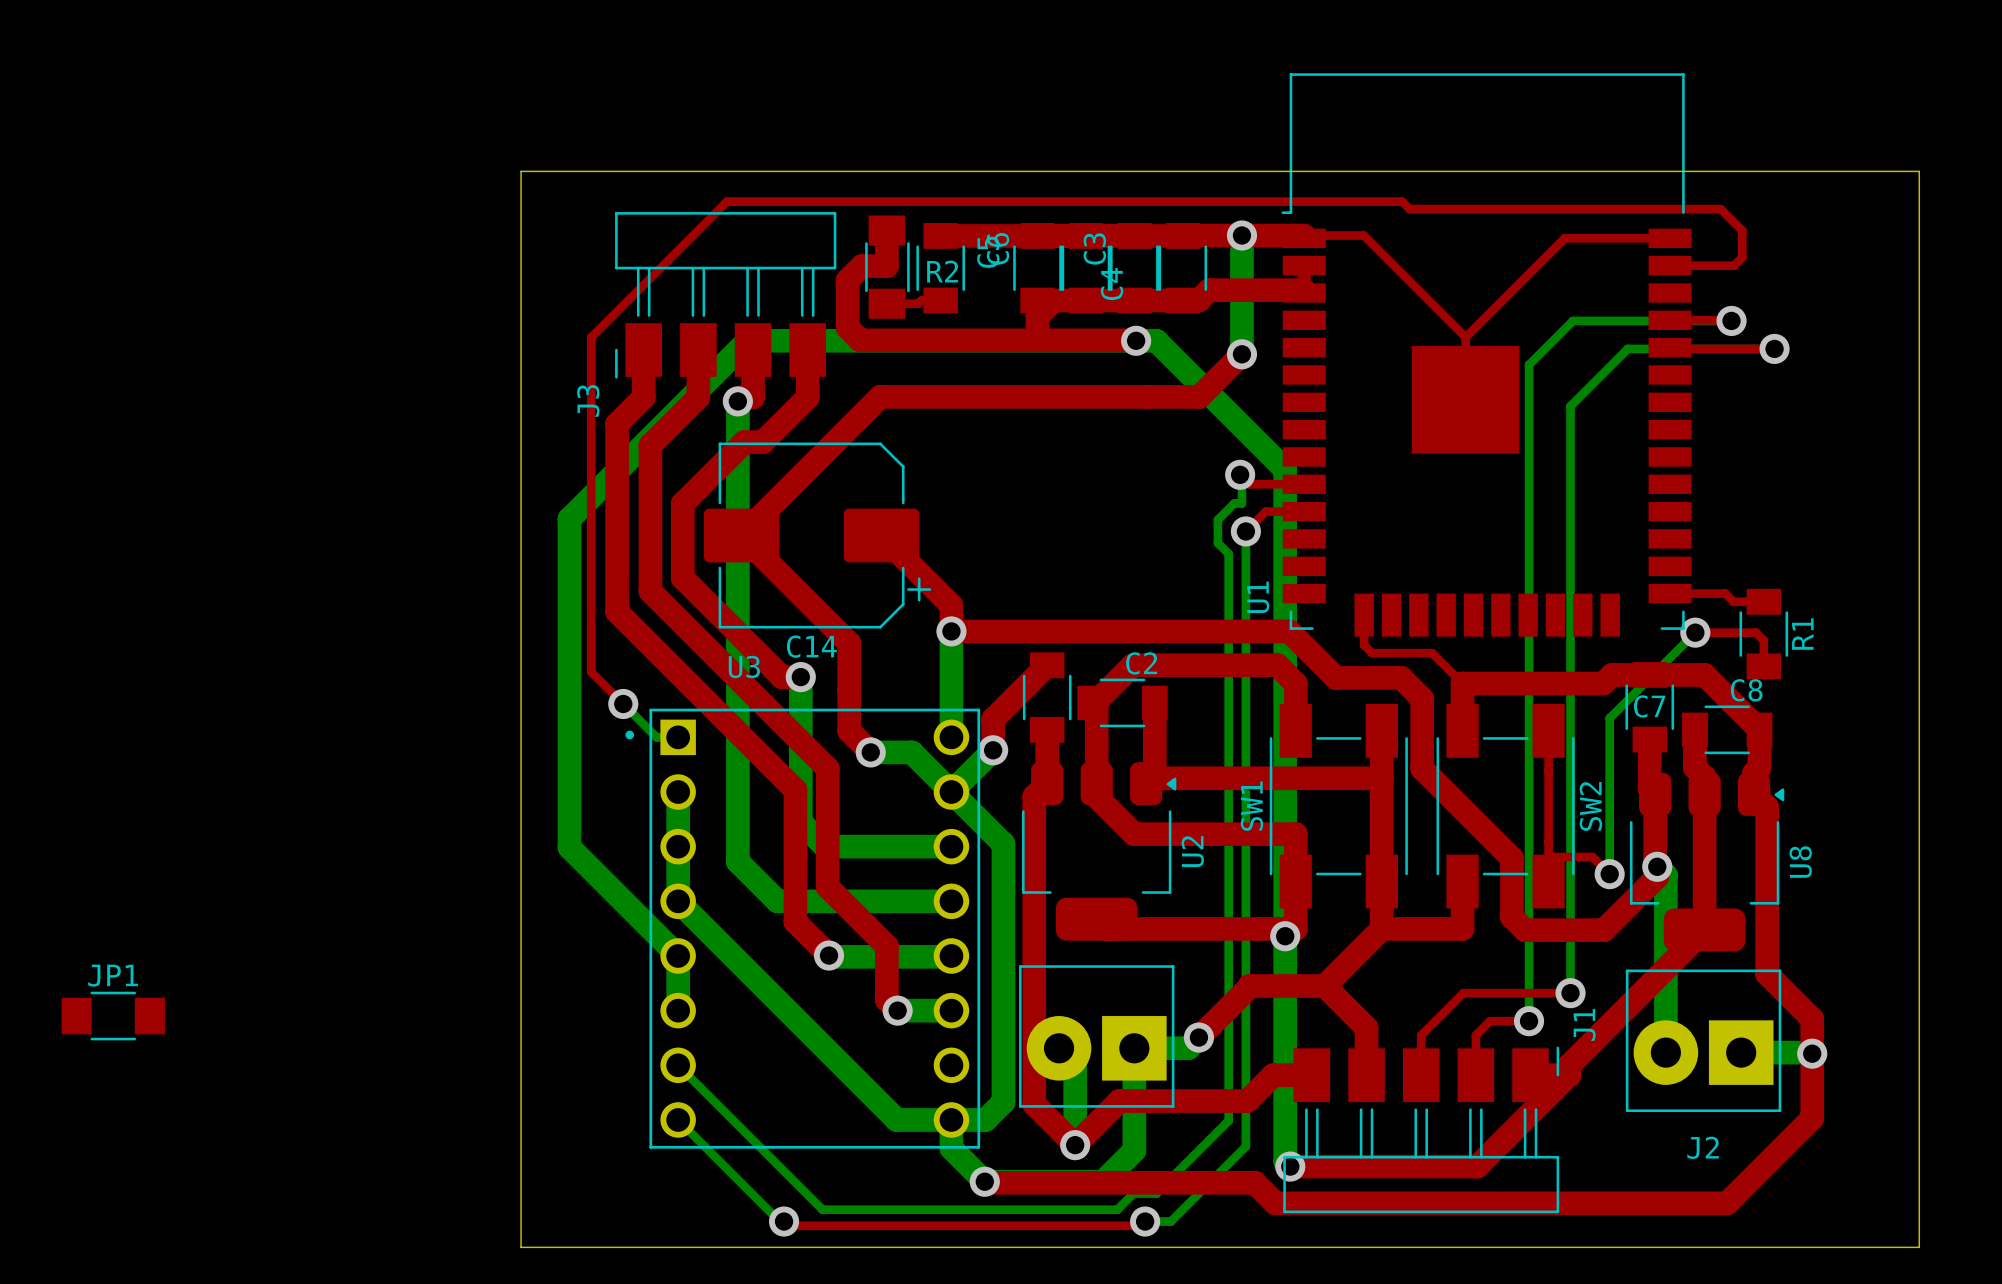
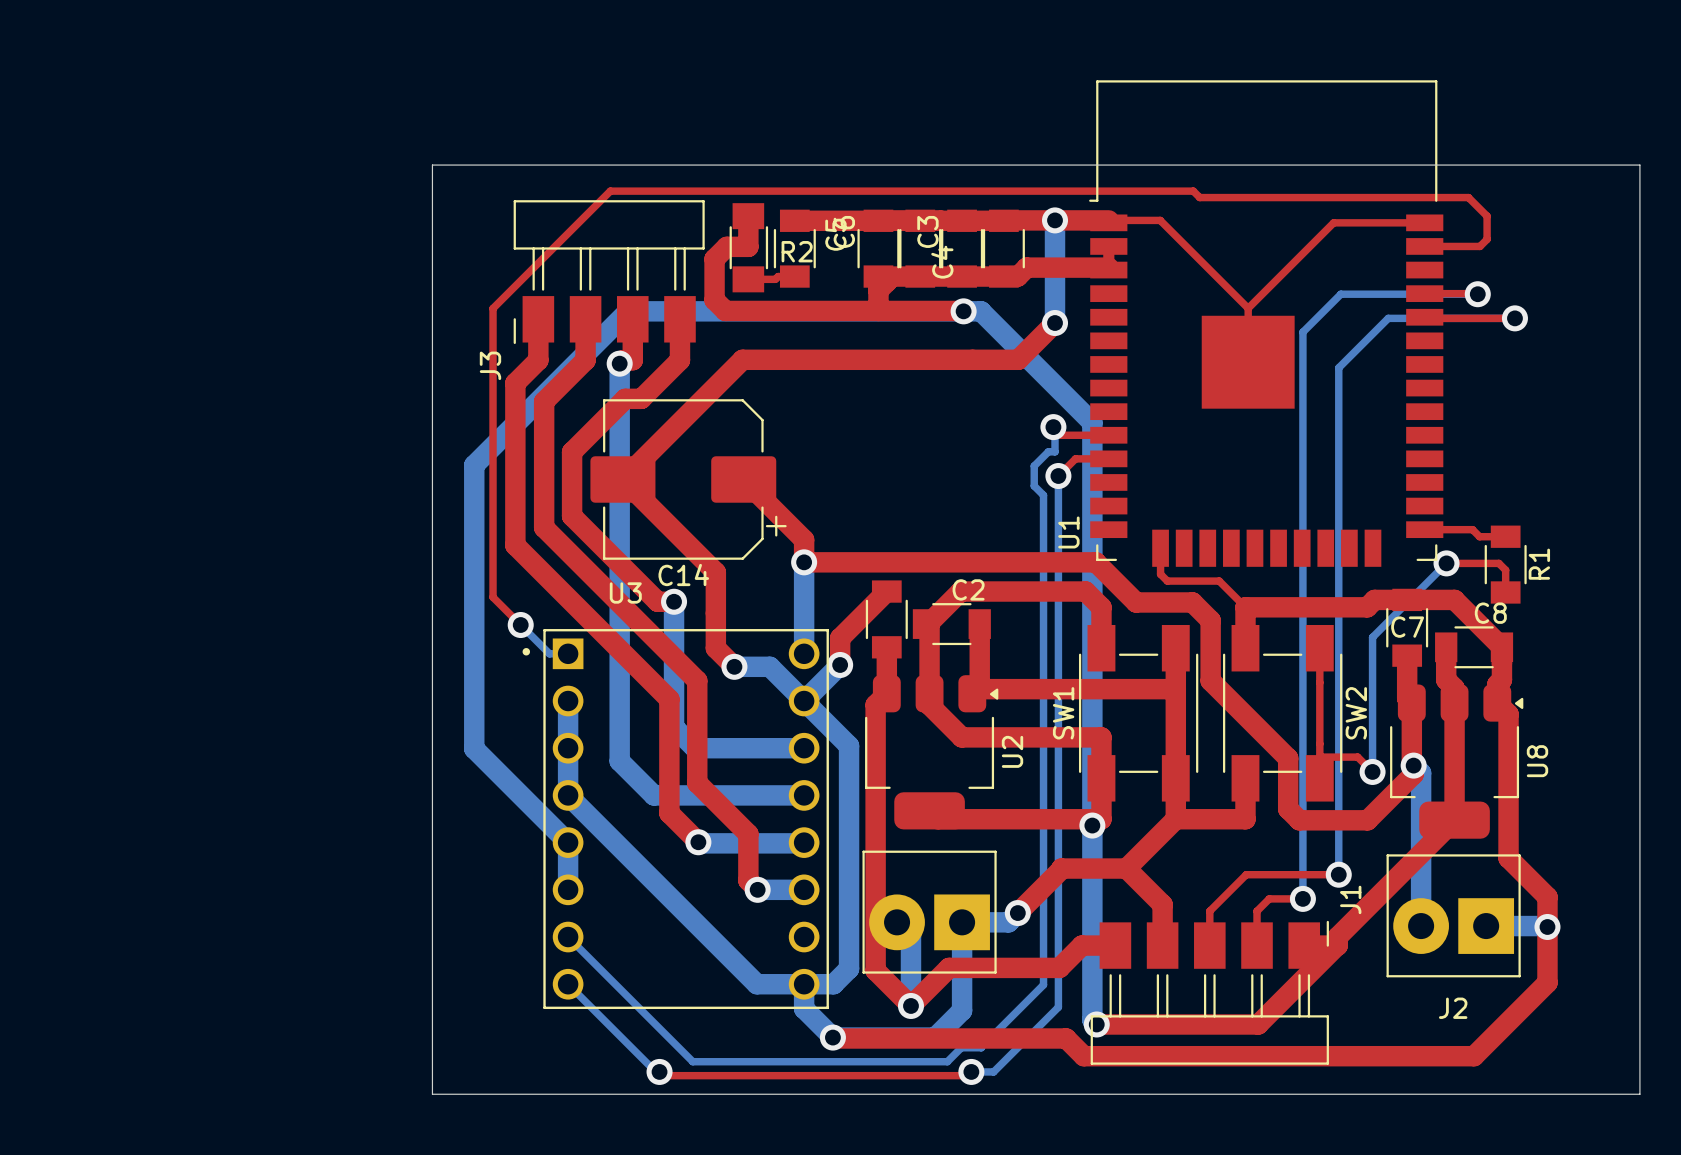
JP1: (113, 1016) -> none

